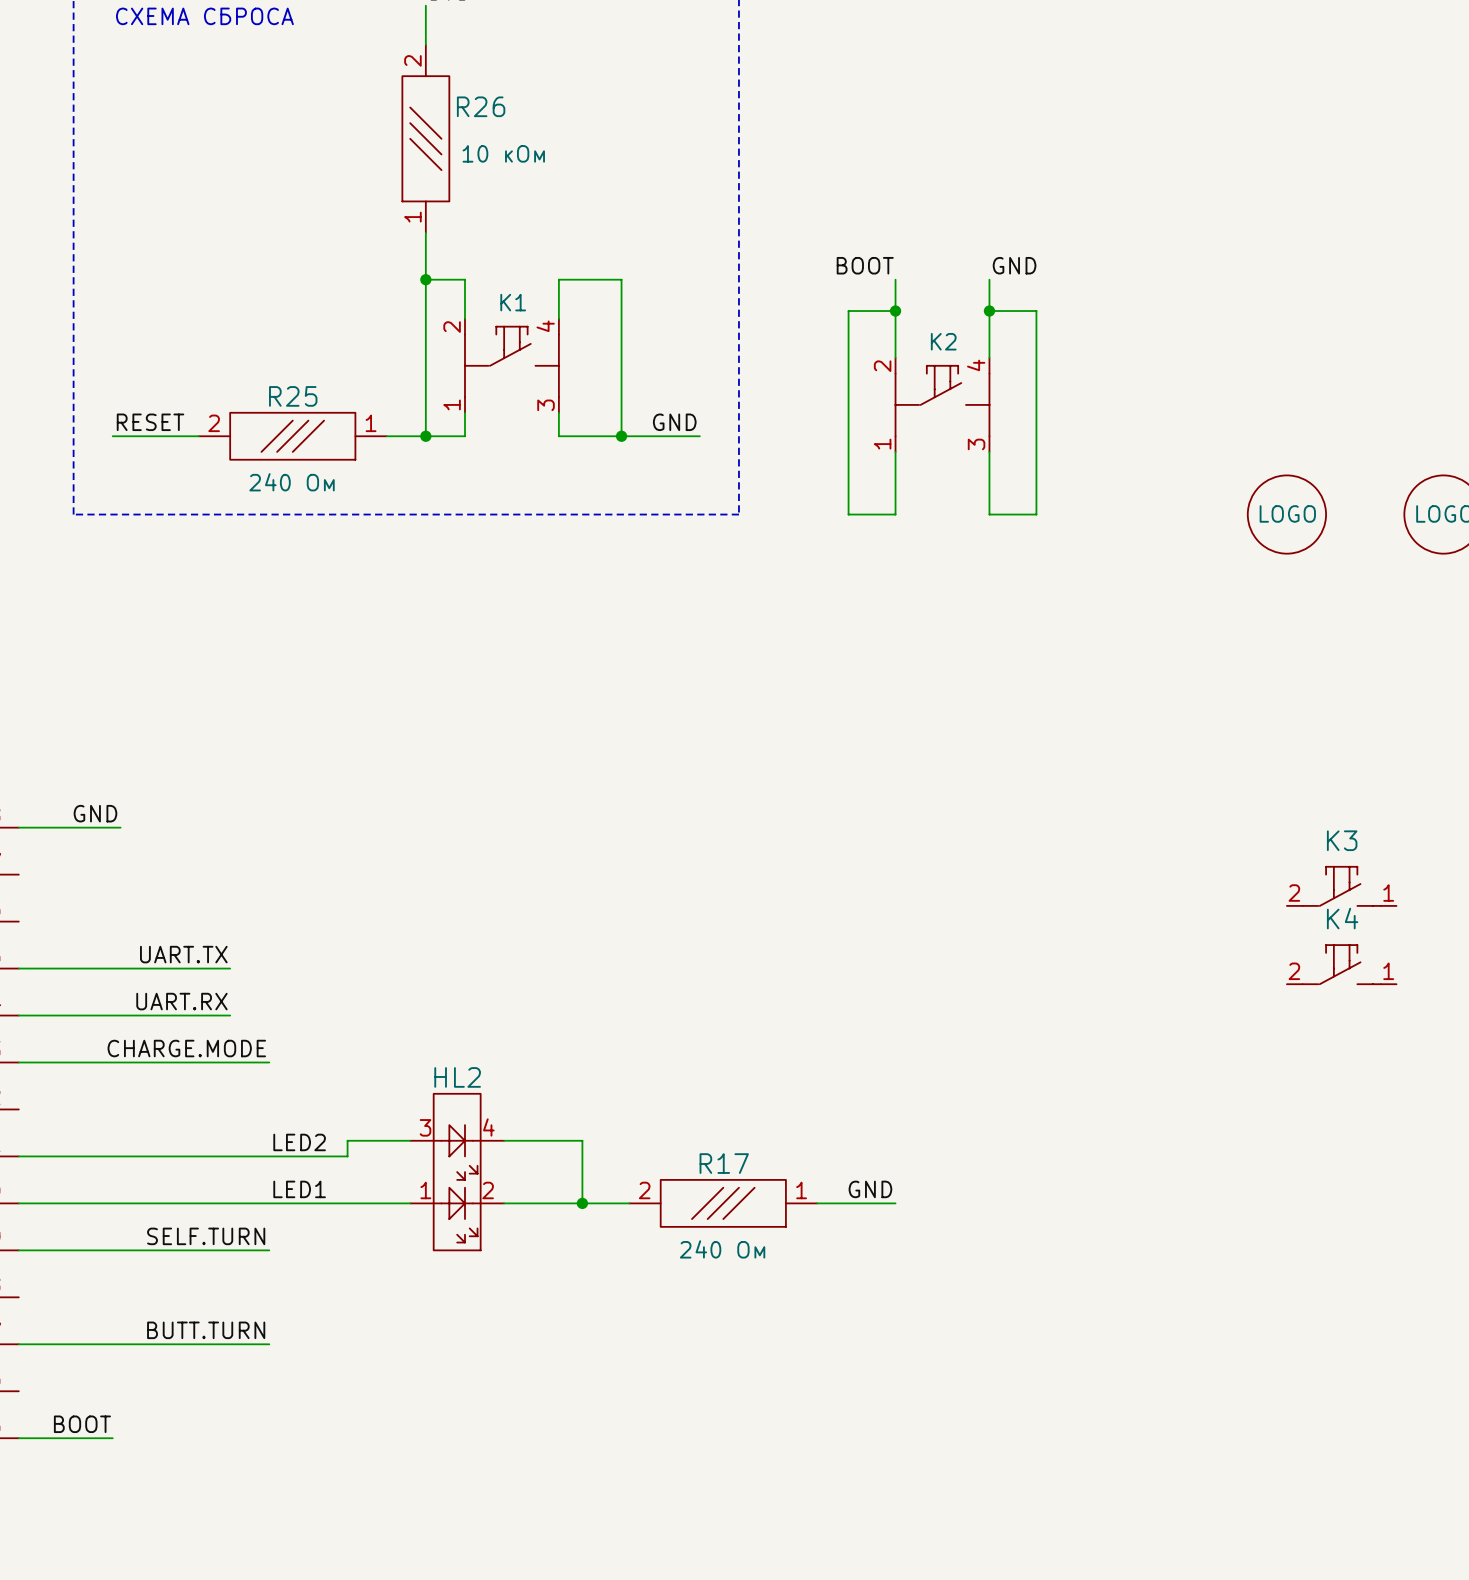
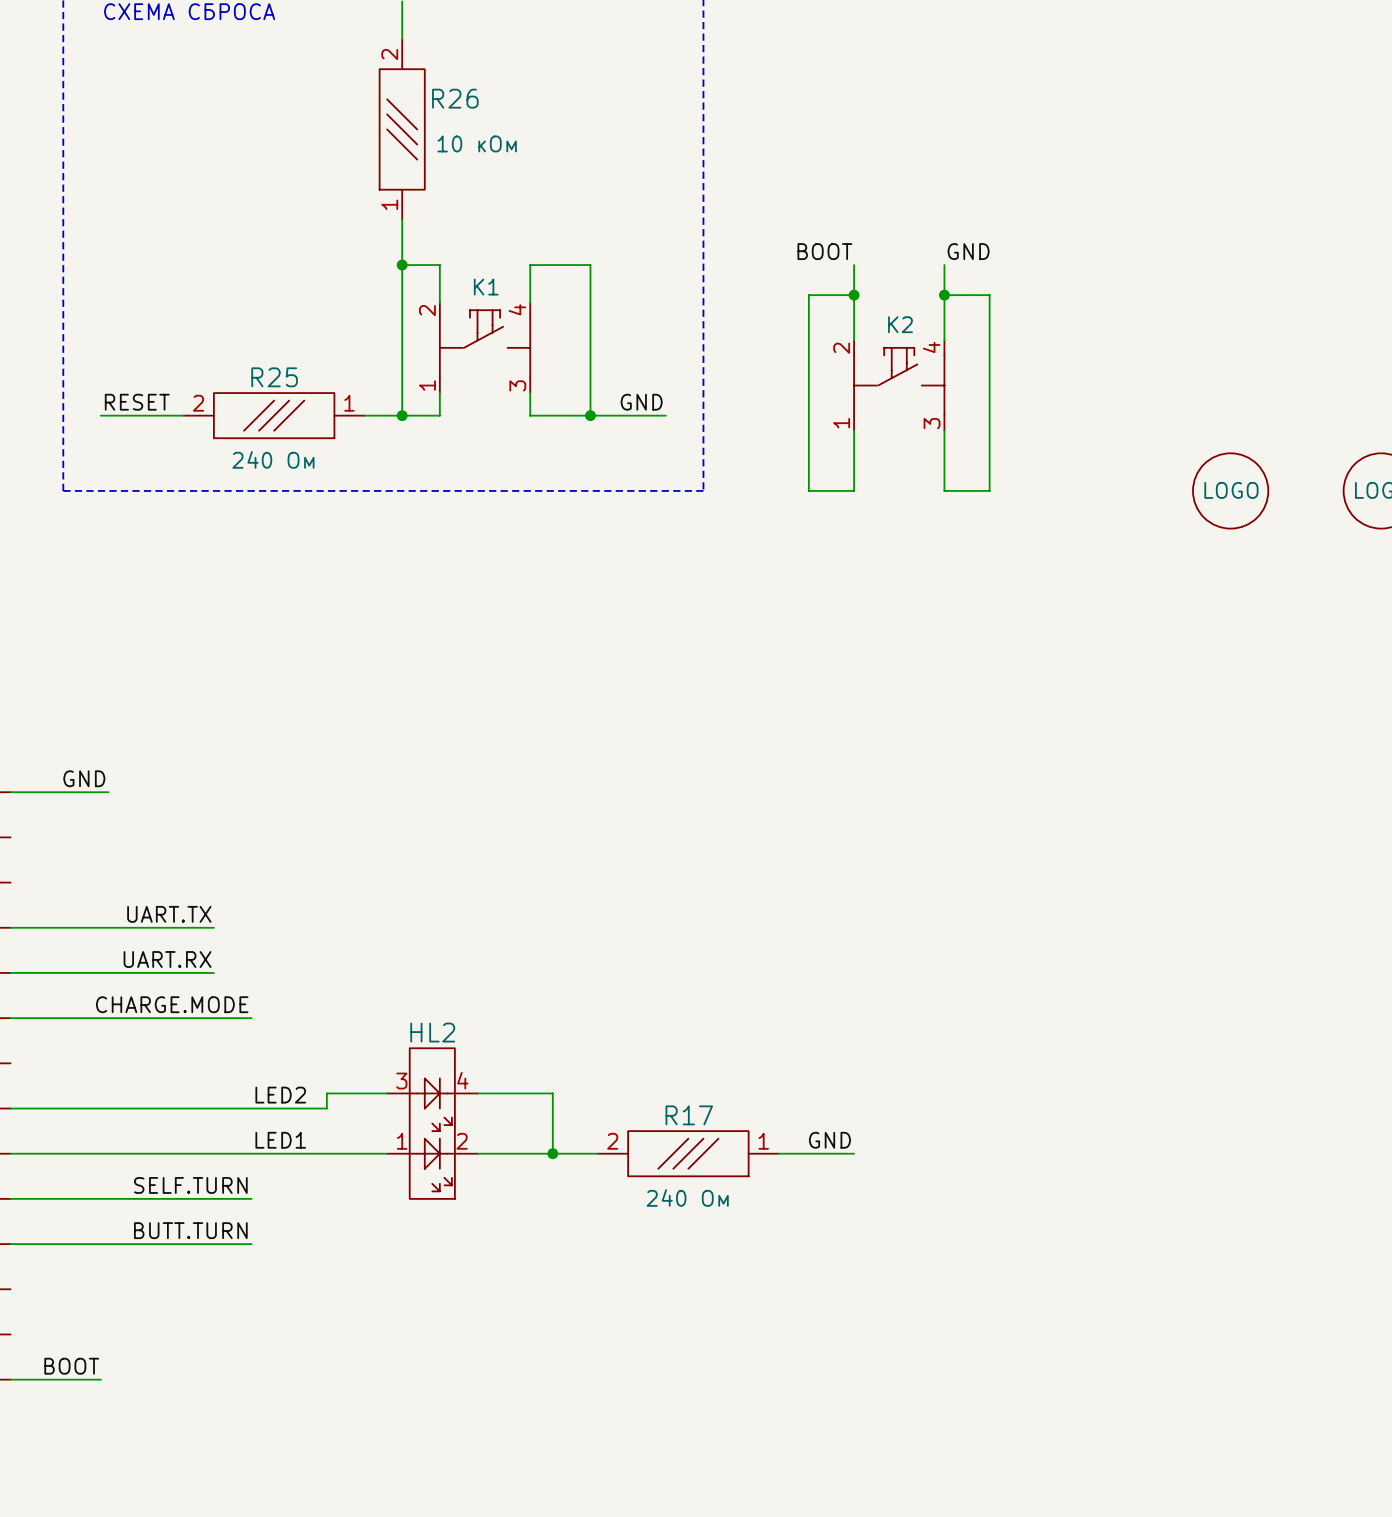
K3: (1341, 886) -> none
K4: (1341, 964) -> none
label position: BUTT.TURN (206, 1330) -> BUTT.TURN (190, 1230)
wire: (18, 1344) (269, 1344) -> (10, 1244) (251, 1244)

